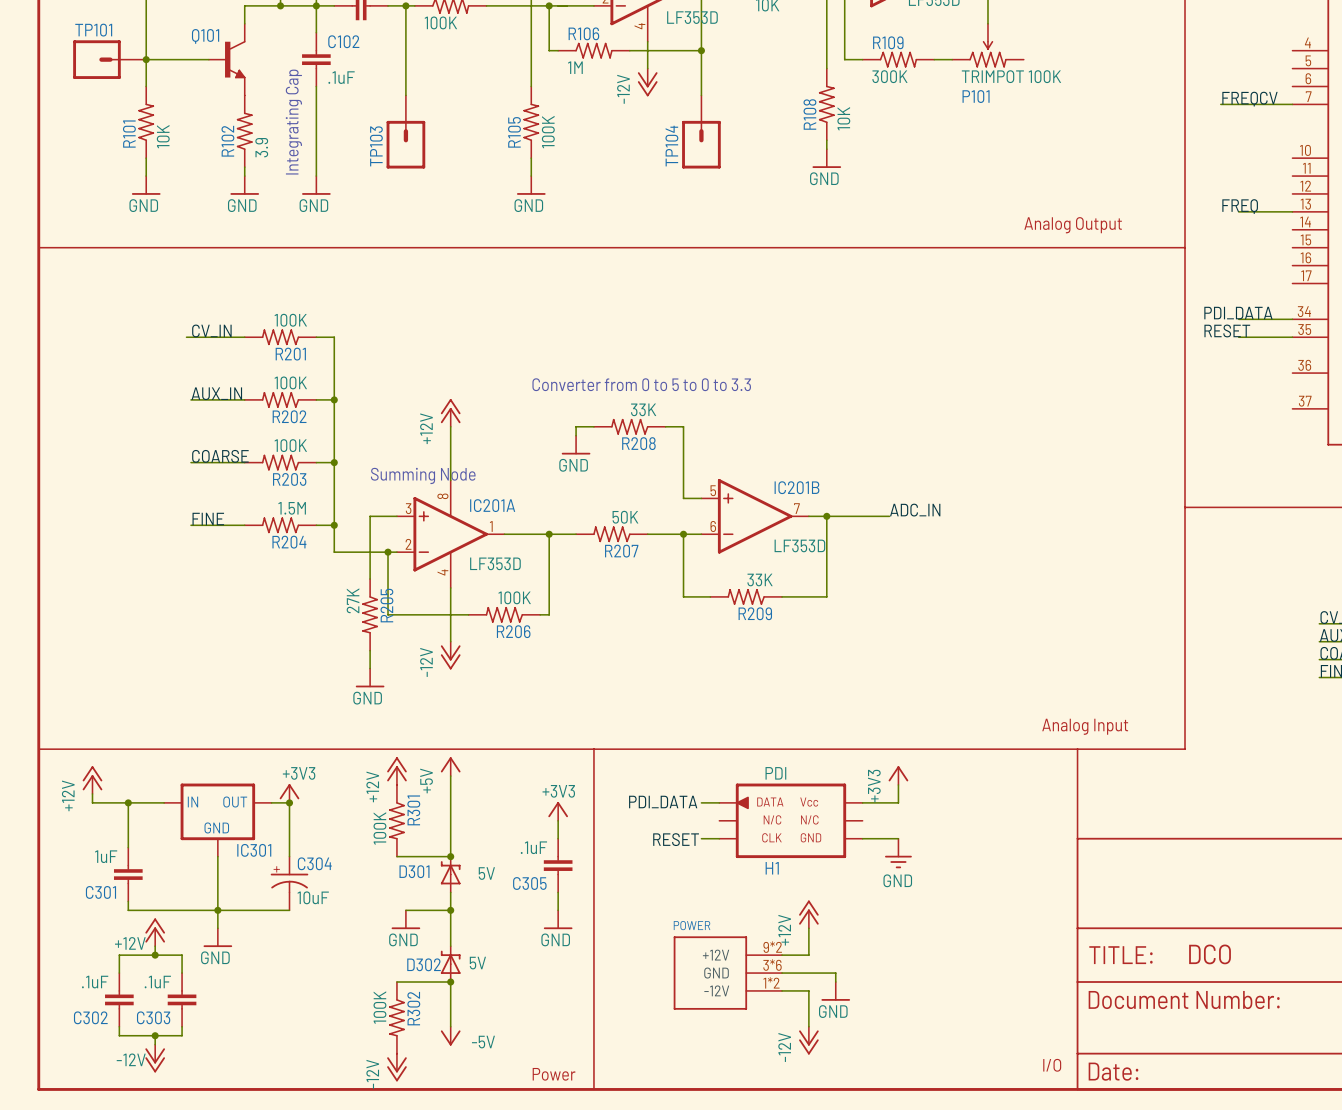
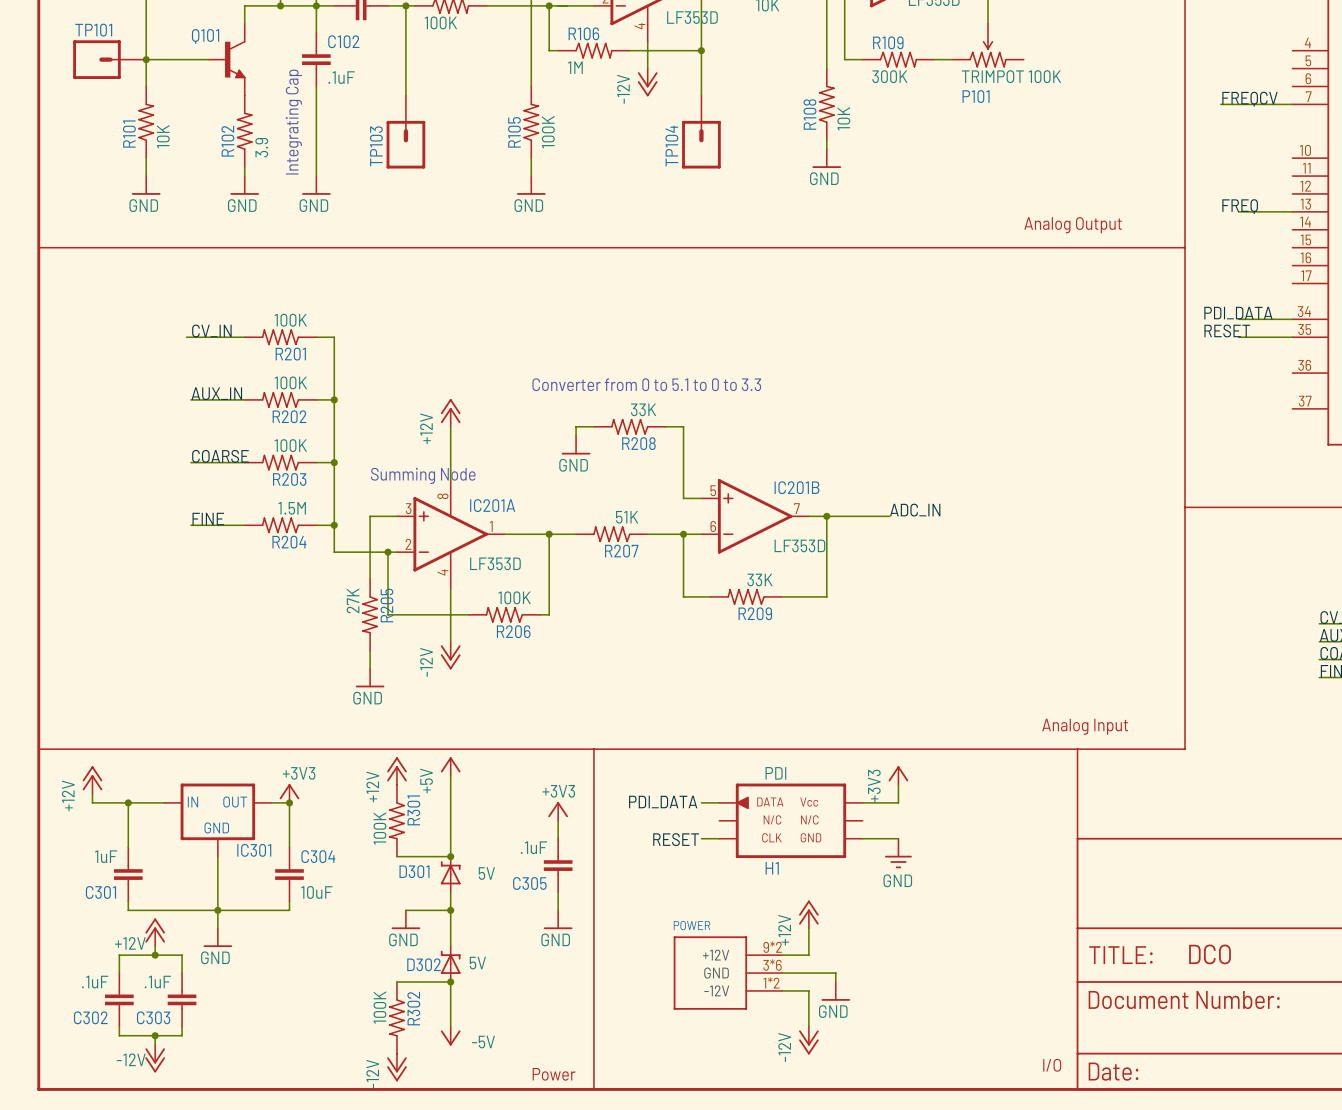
text: Converter from 0 to 5 to 0 to 3.3 (641, 384) -> Converter from 0 to 5.1 to 0 to 3.3 (646, 384)
R207 value: 50K (625, 517) -> 51K (627, 517)
C304 symbol: [270, 856, 309, 911] -> [275, 847, 304, 902]

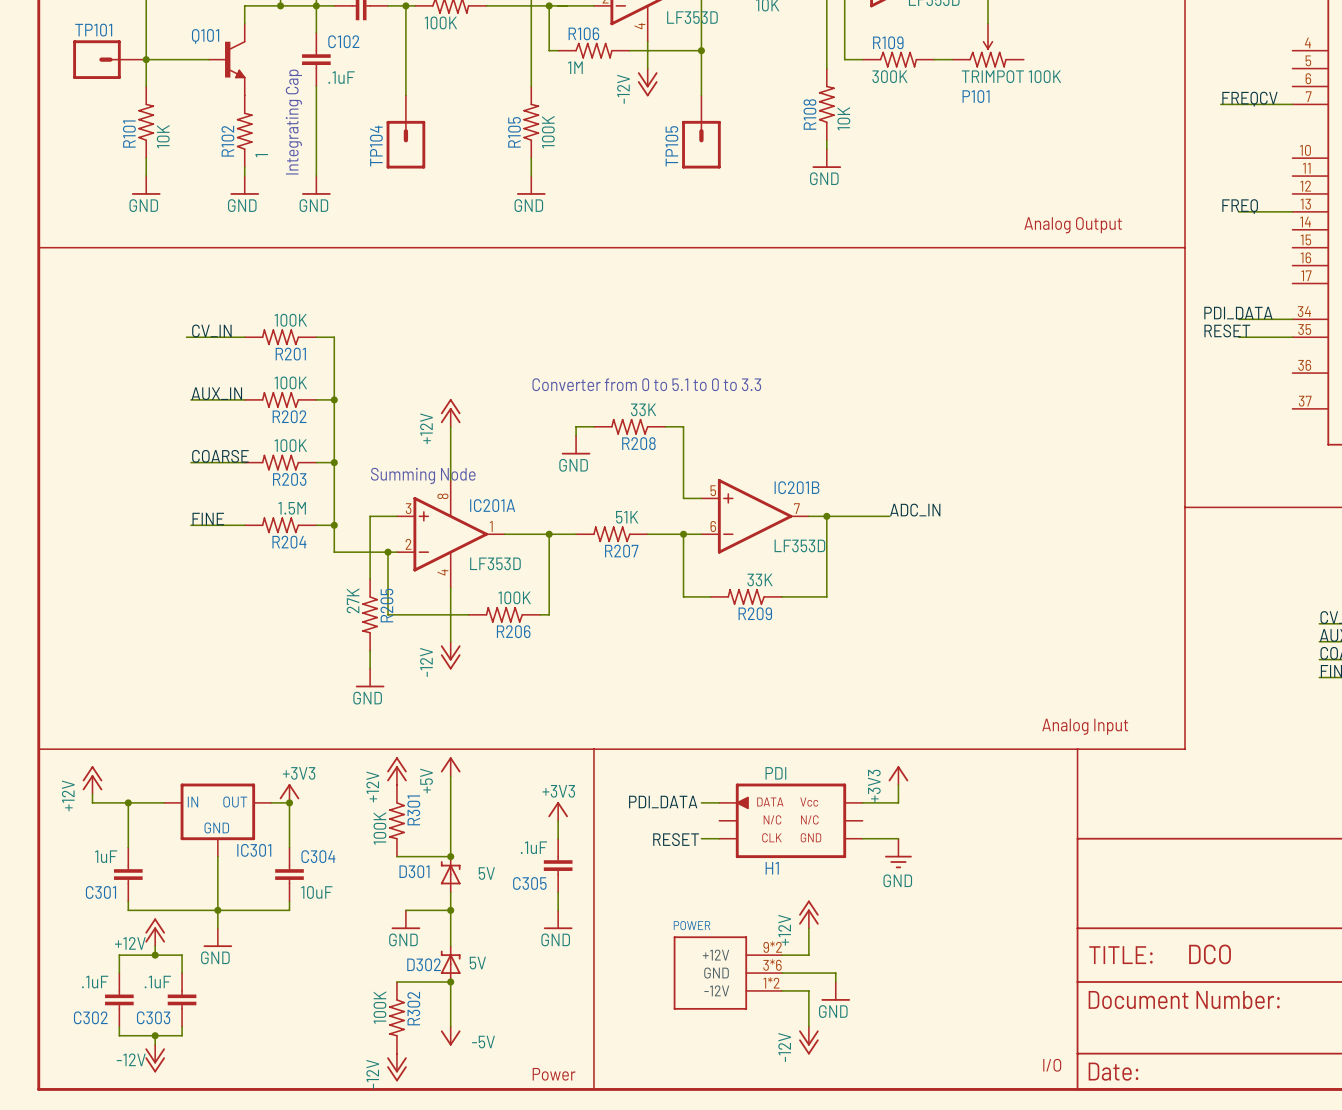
TP103 name: TP103 (376, 146) -> TP104 (376, 146)
TP104 name: TP104 (671, 146) -> TP105 (671, 146)
R102 value: 3.9 (261, 147) -> 1 (261, 155)

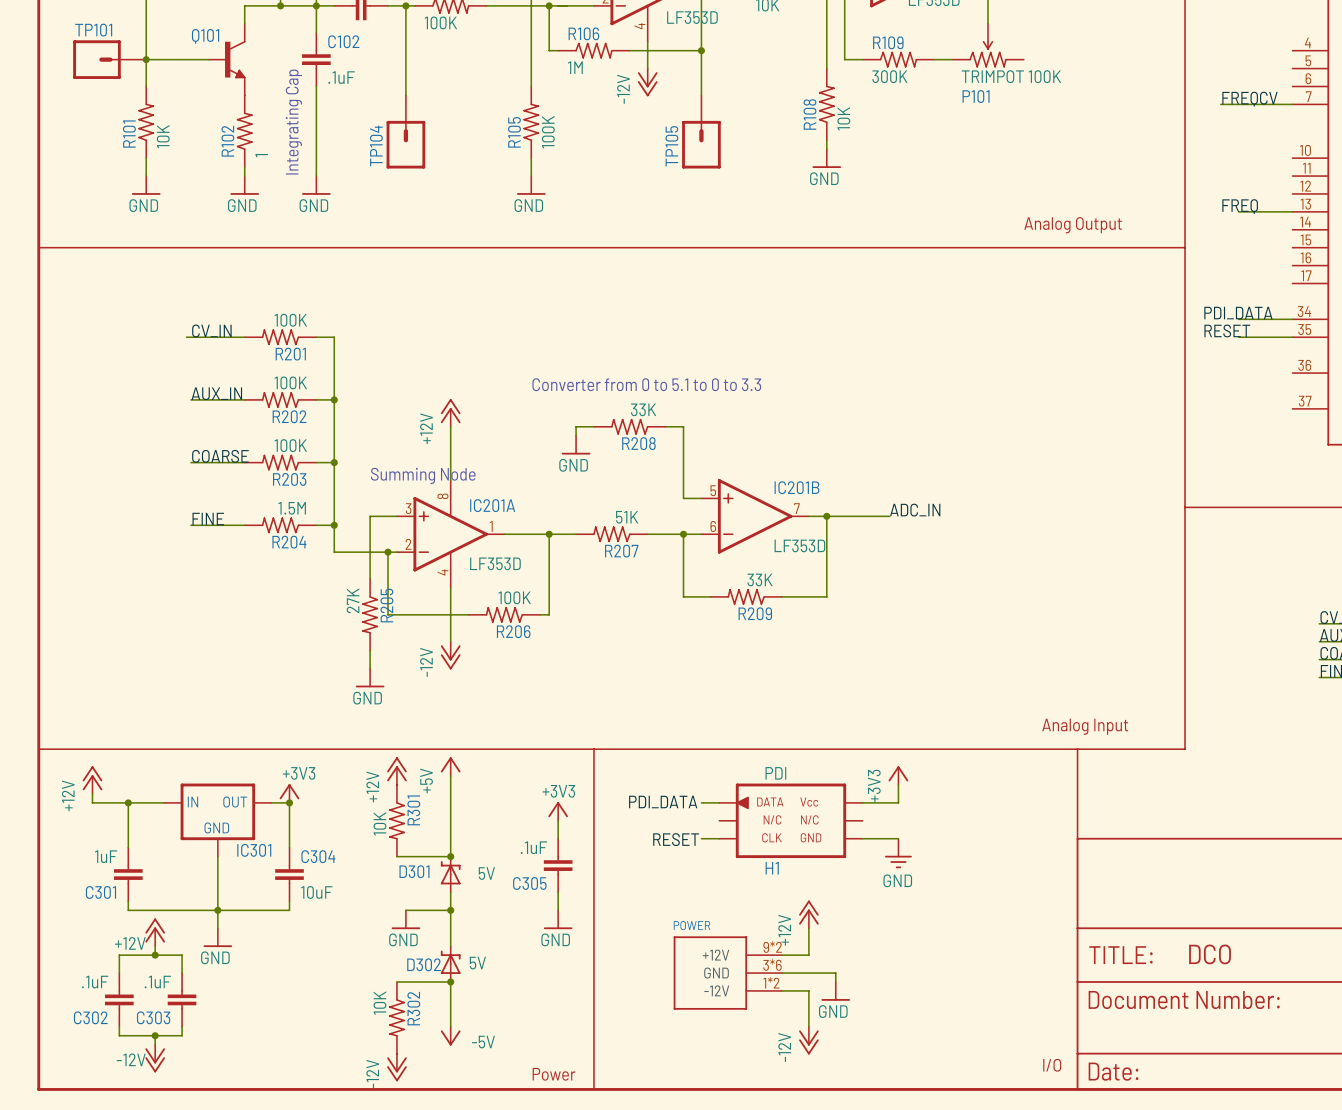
R301 value: 100K (379, 828) -> 10K (379, 823)
R302 value: 100K (379, 1007) -> 10K (379, 1003)

